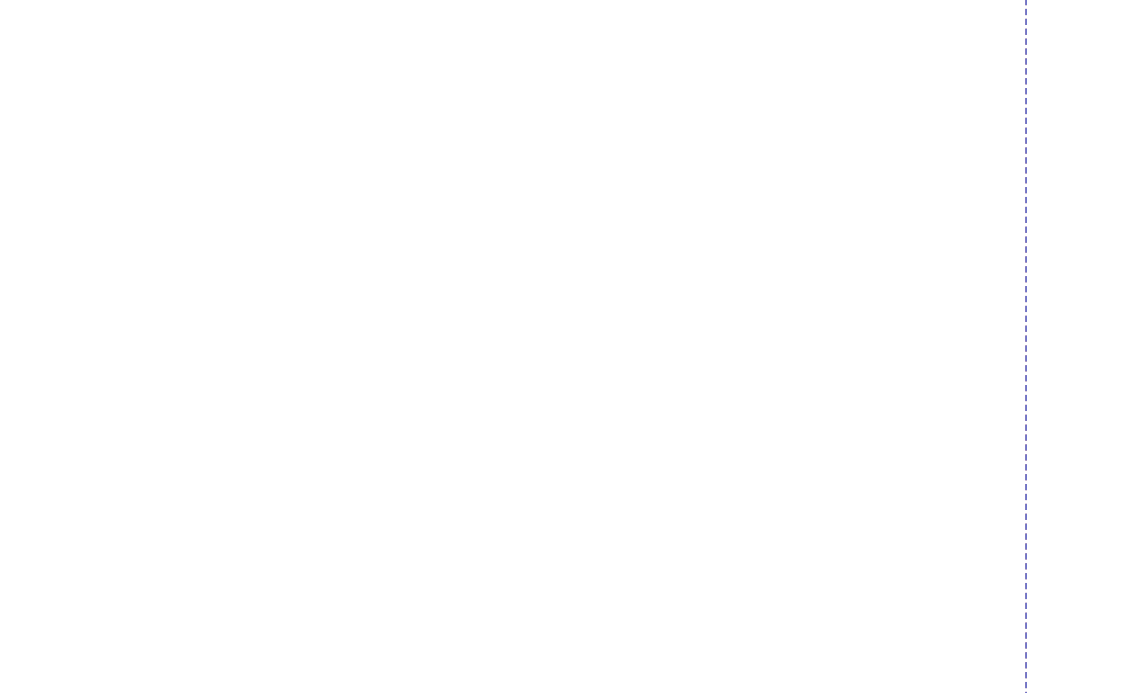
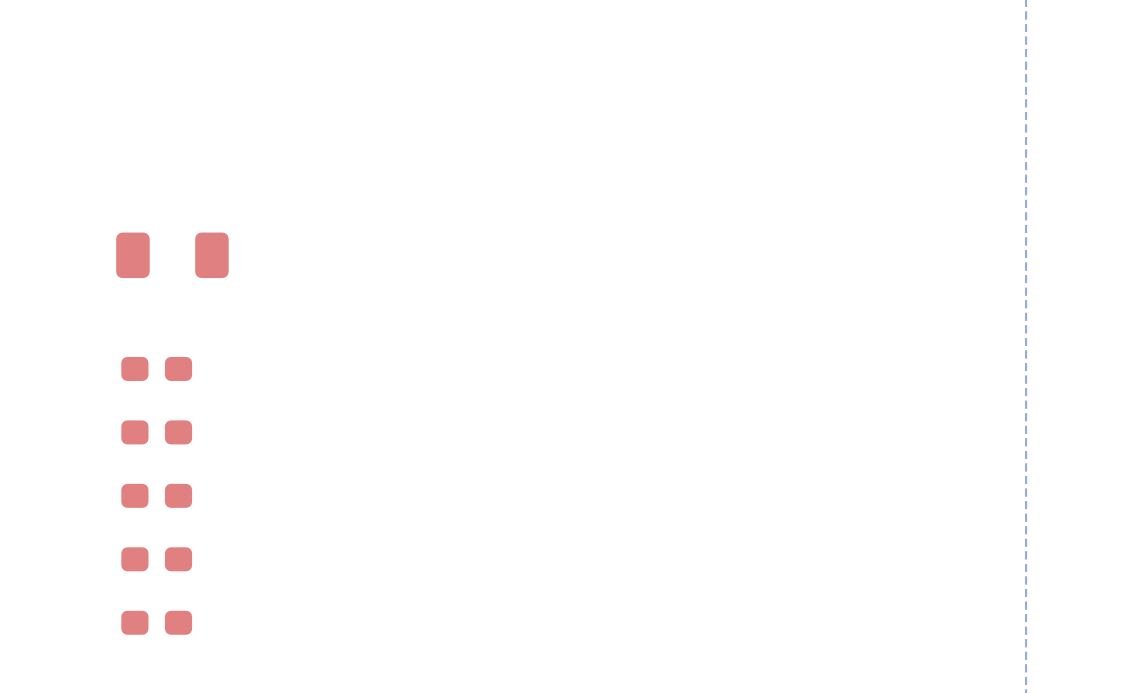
part: none -> (172, 255)
part: none -> (156, 368)
part: none -> (156, 432)
part: none -> (156, 495)
part: none -> (156, 559)
part: none -> (156, 622)

